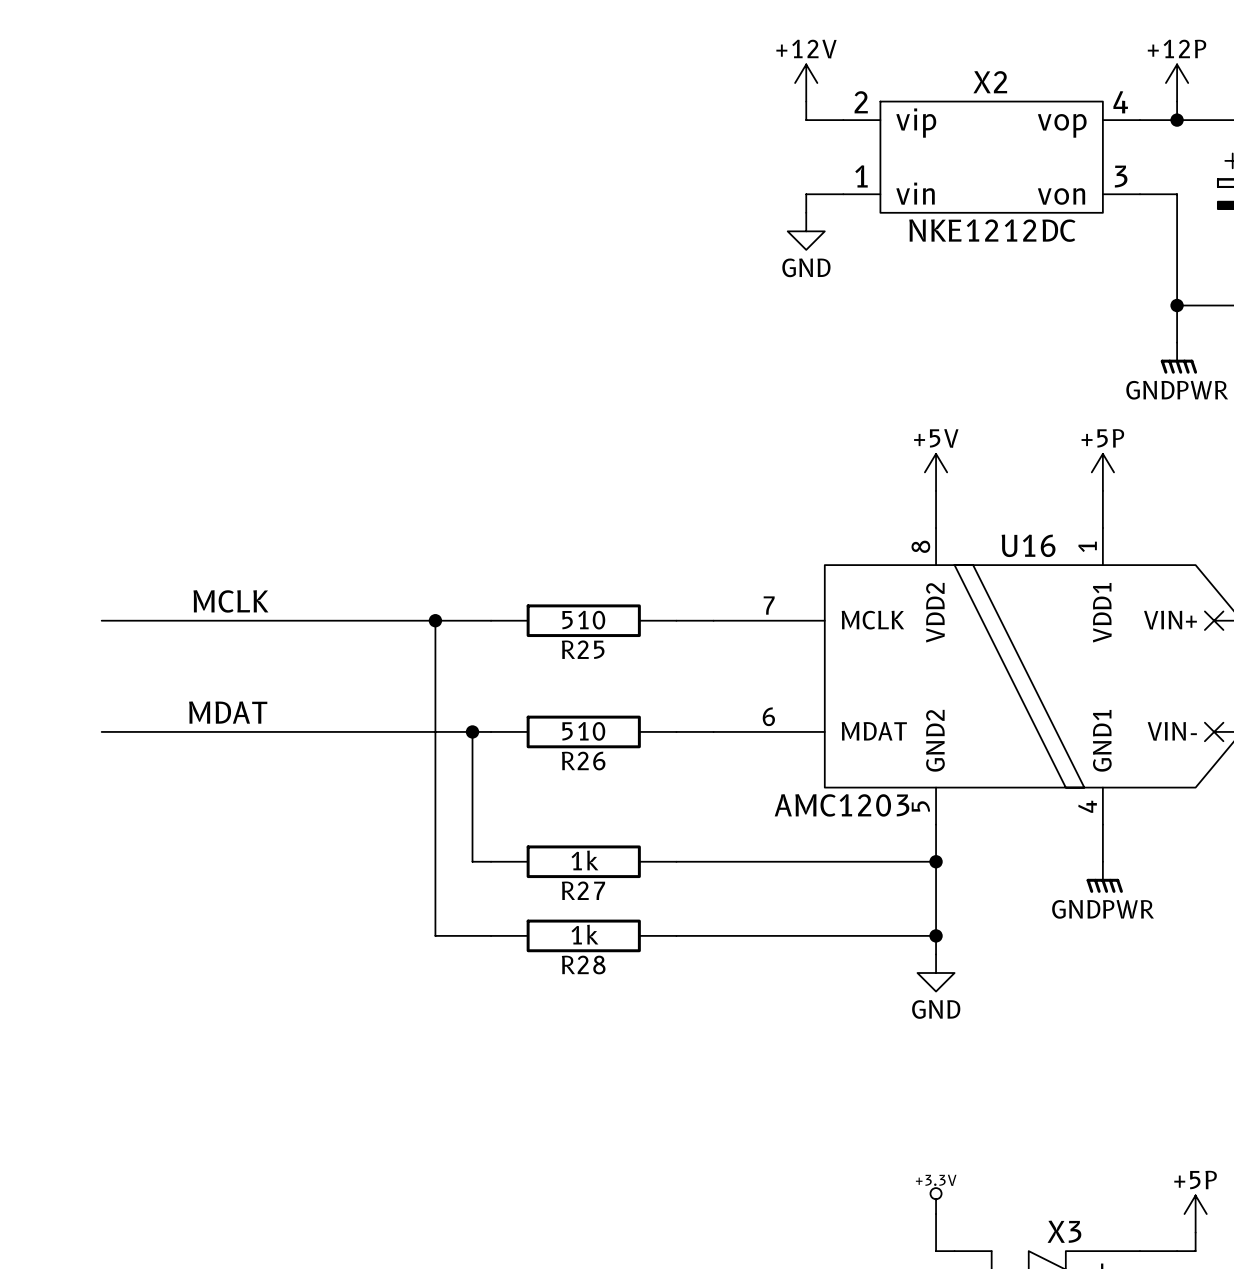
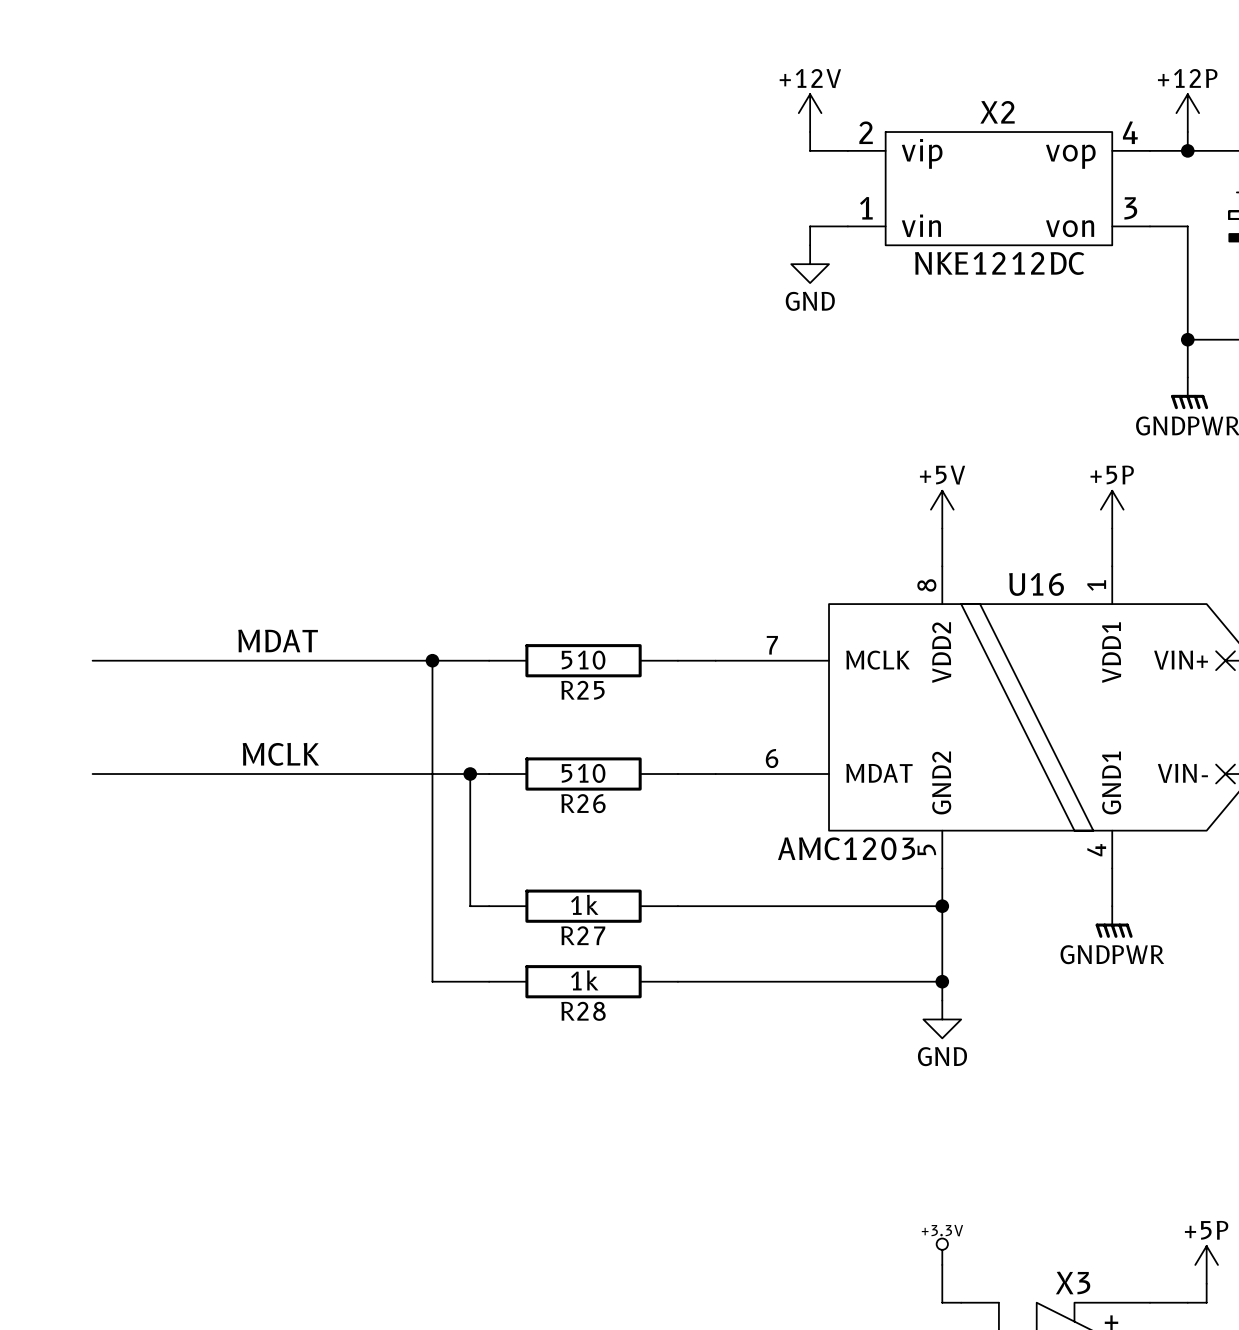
label position: MCLK (230, 601) -> MCLK (280, 754)
label position: MDAT (228, 712) -> MDAT (278, 640)

